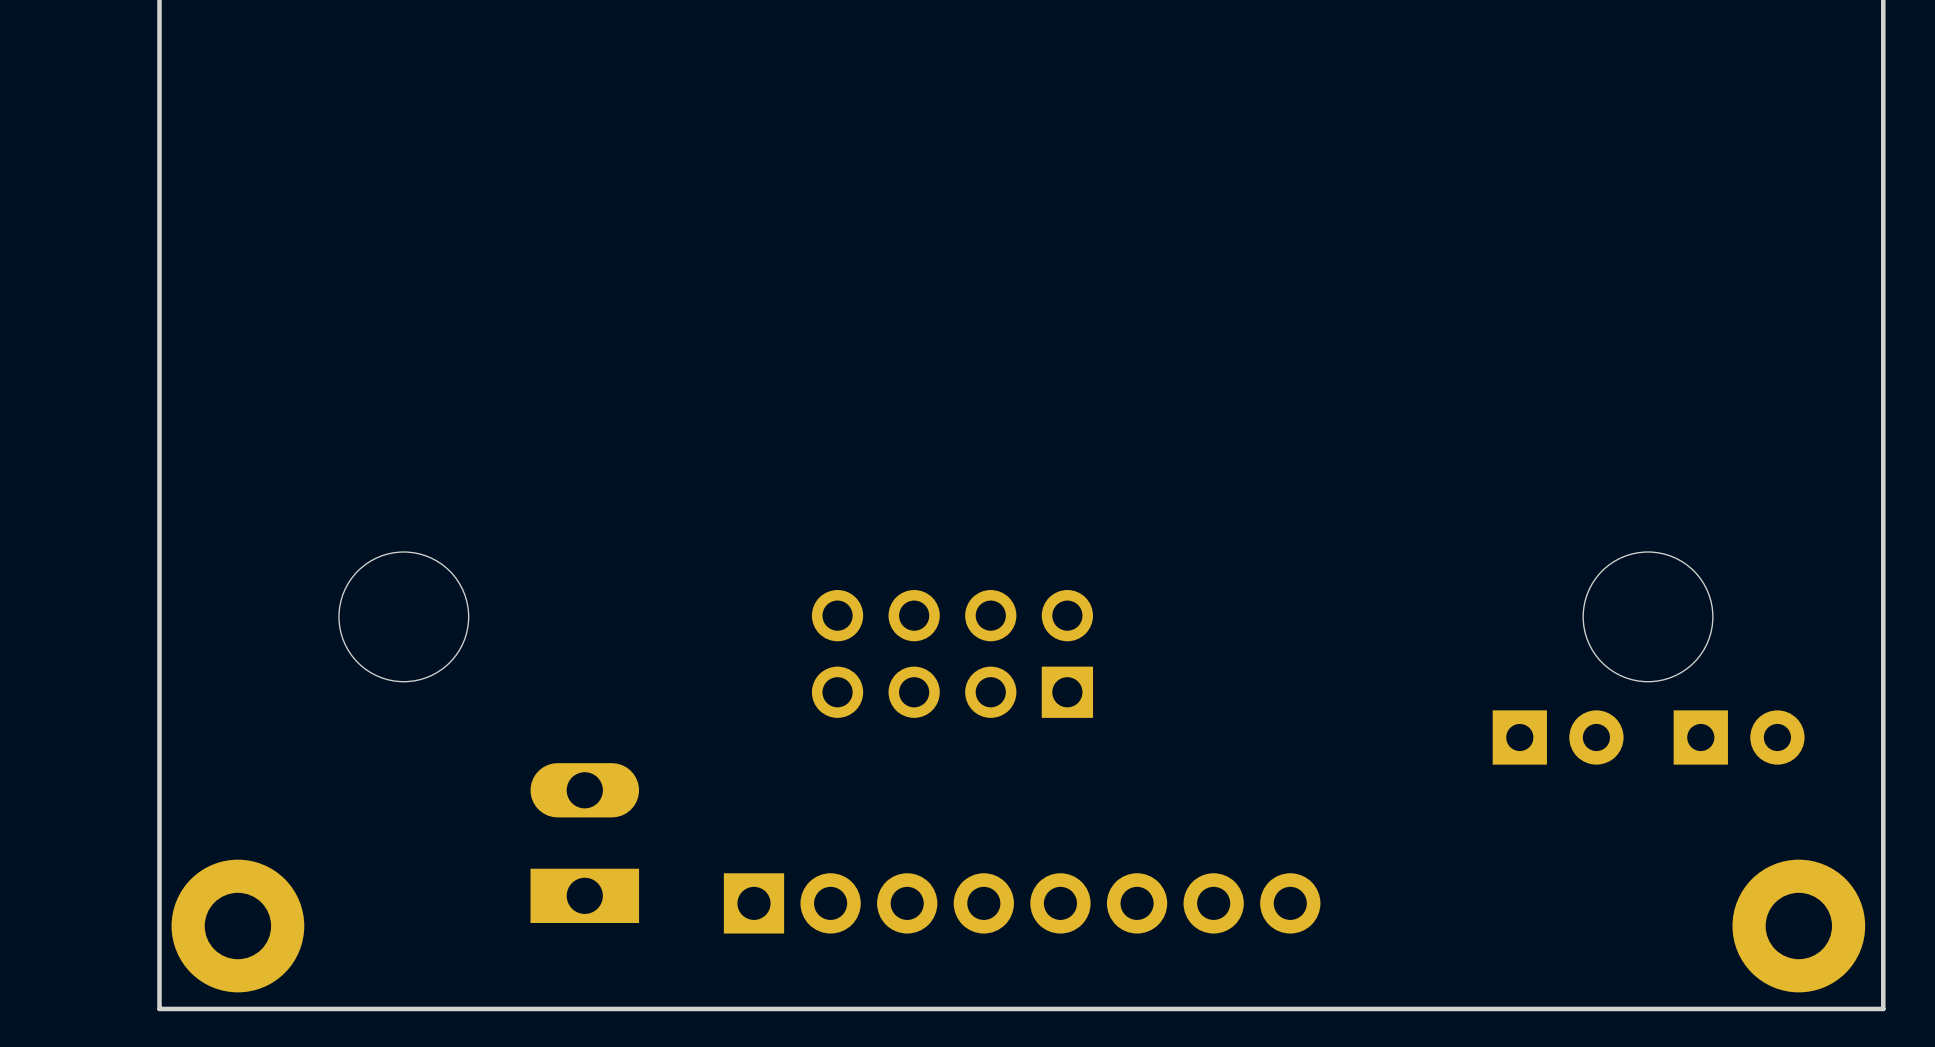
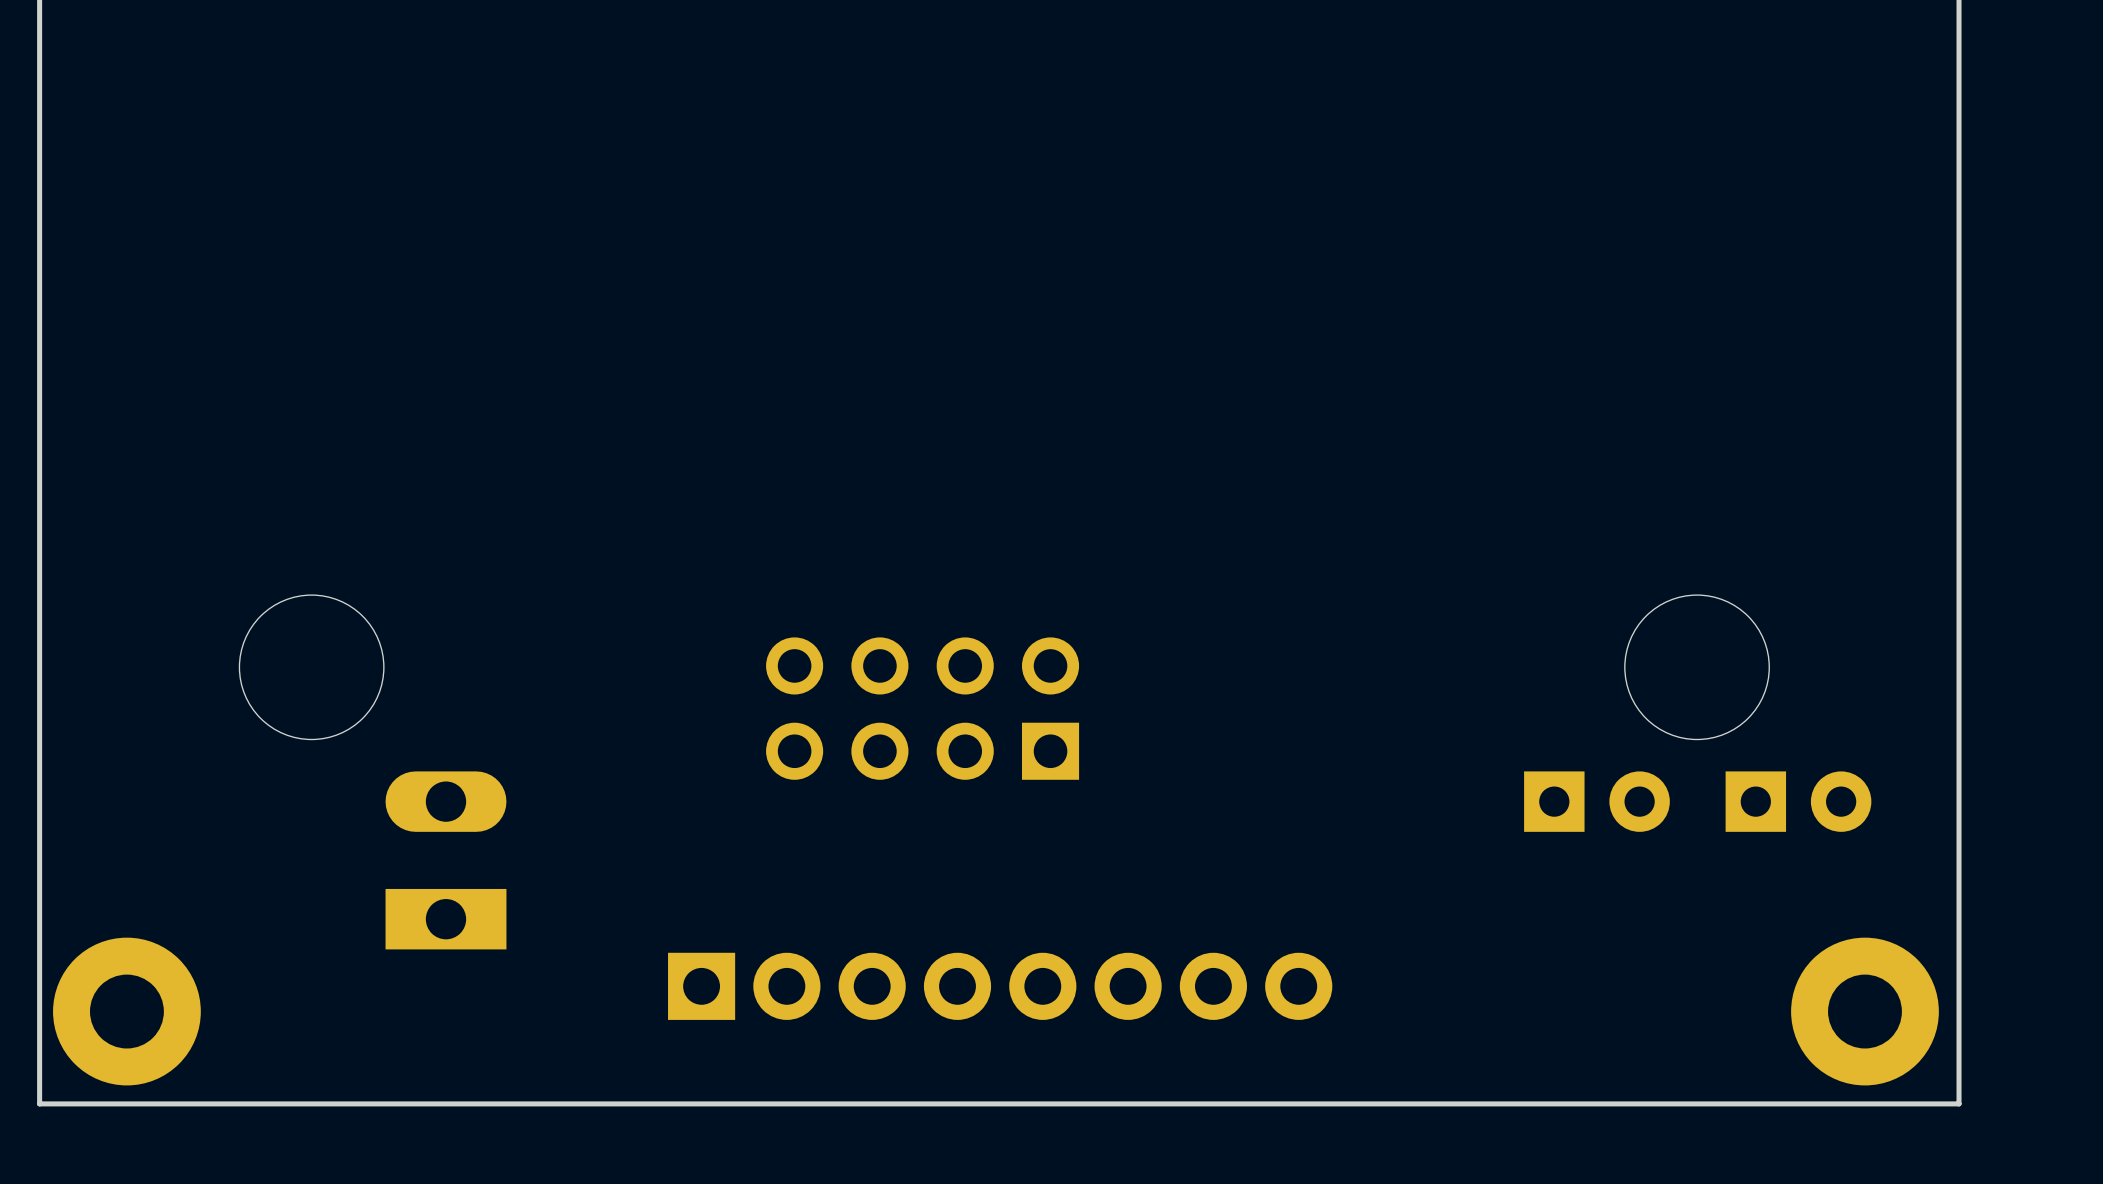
part position: (584, 843) -> (445, 860)

